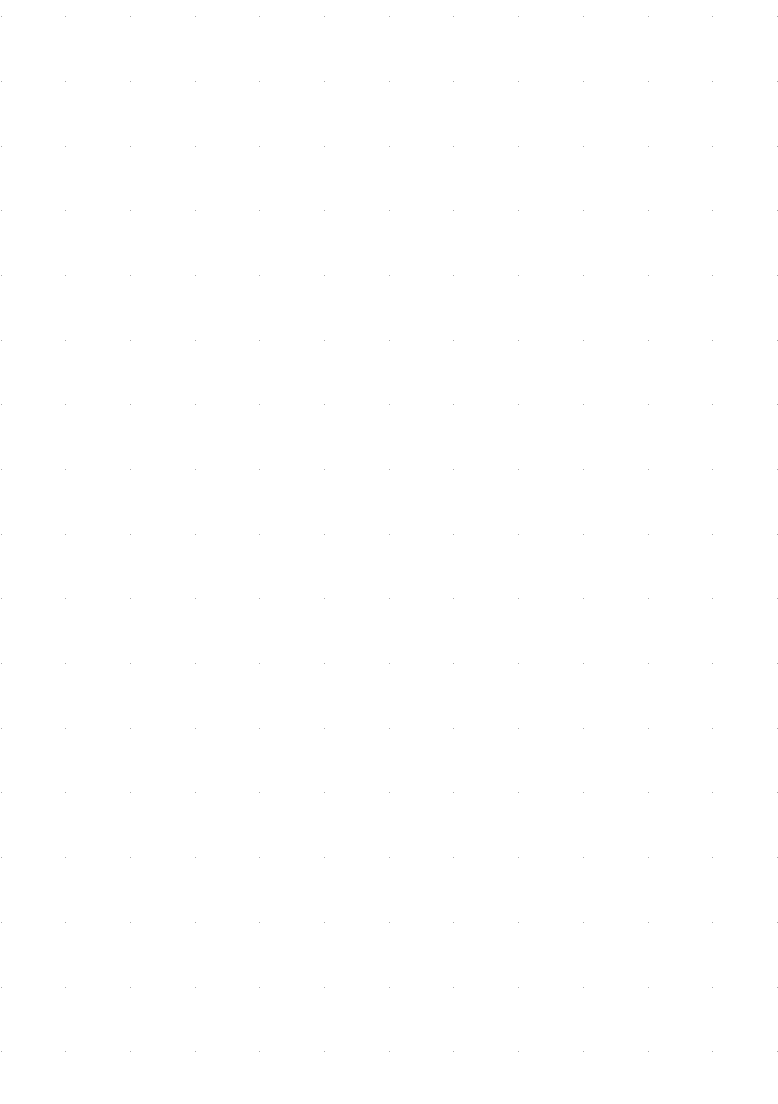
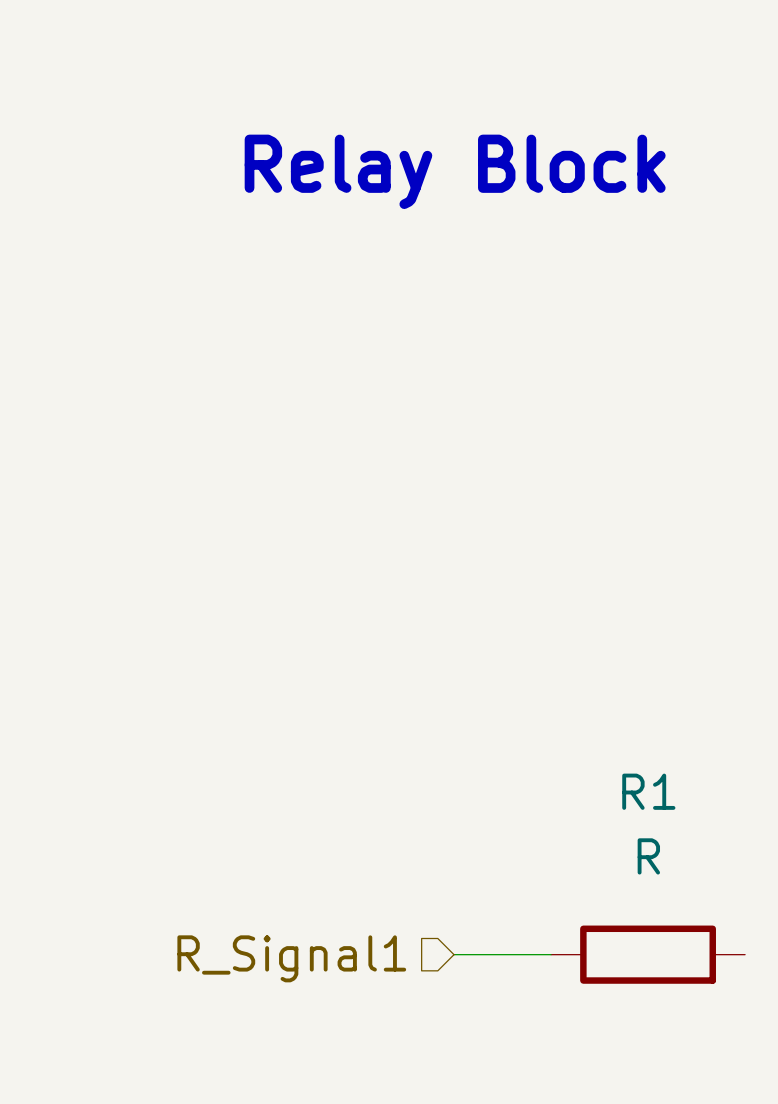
text: none -> Relay Block (455, 171)
wire: none -> (453, 954) (551, 954)
R1: none -> R (648, 954)
hierarchical label: none -> R_Signal1 (291, 958)

